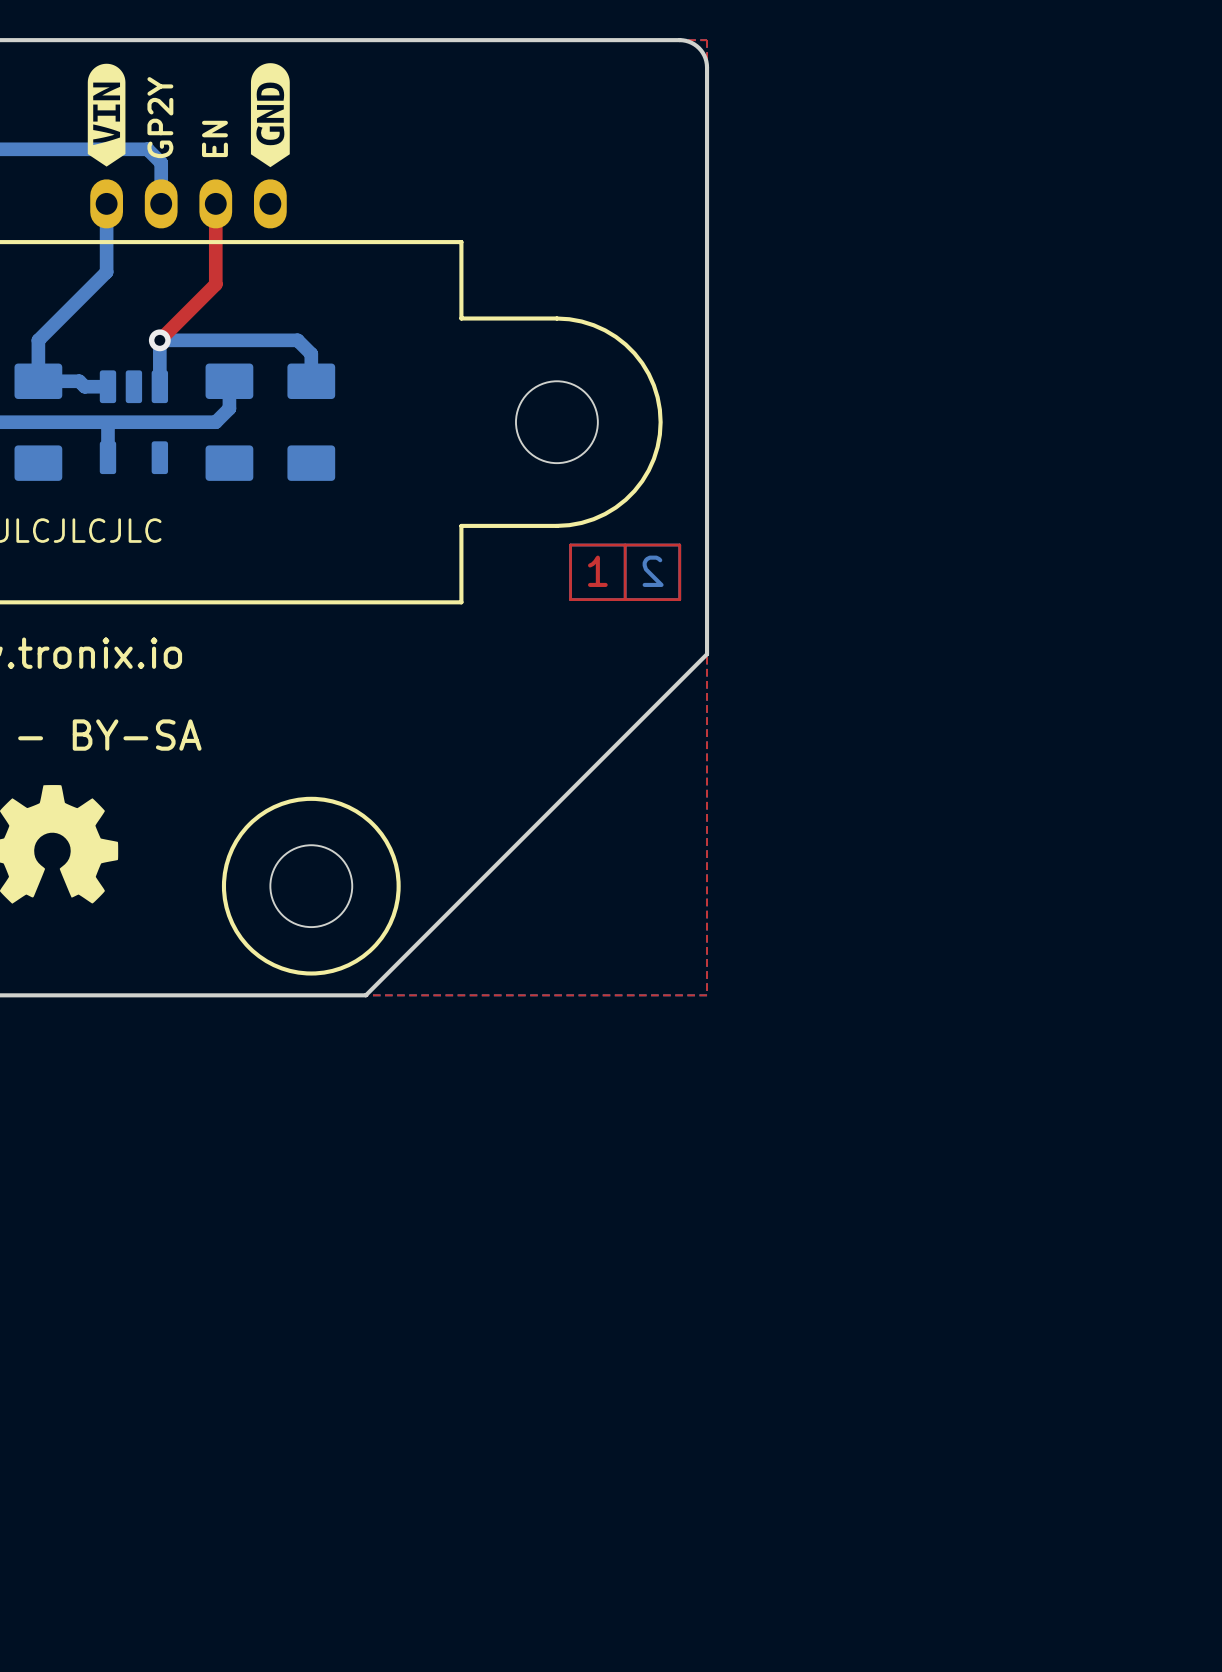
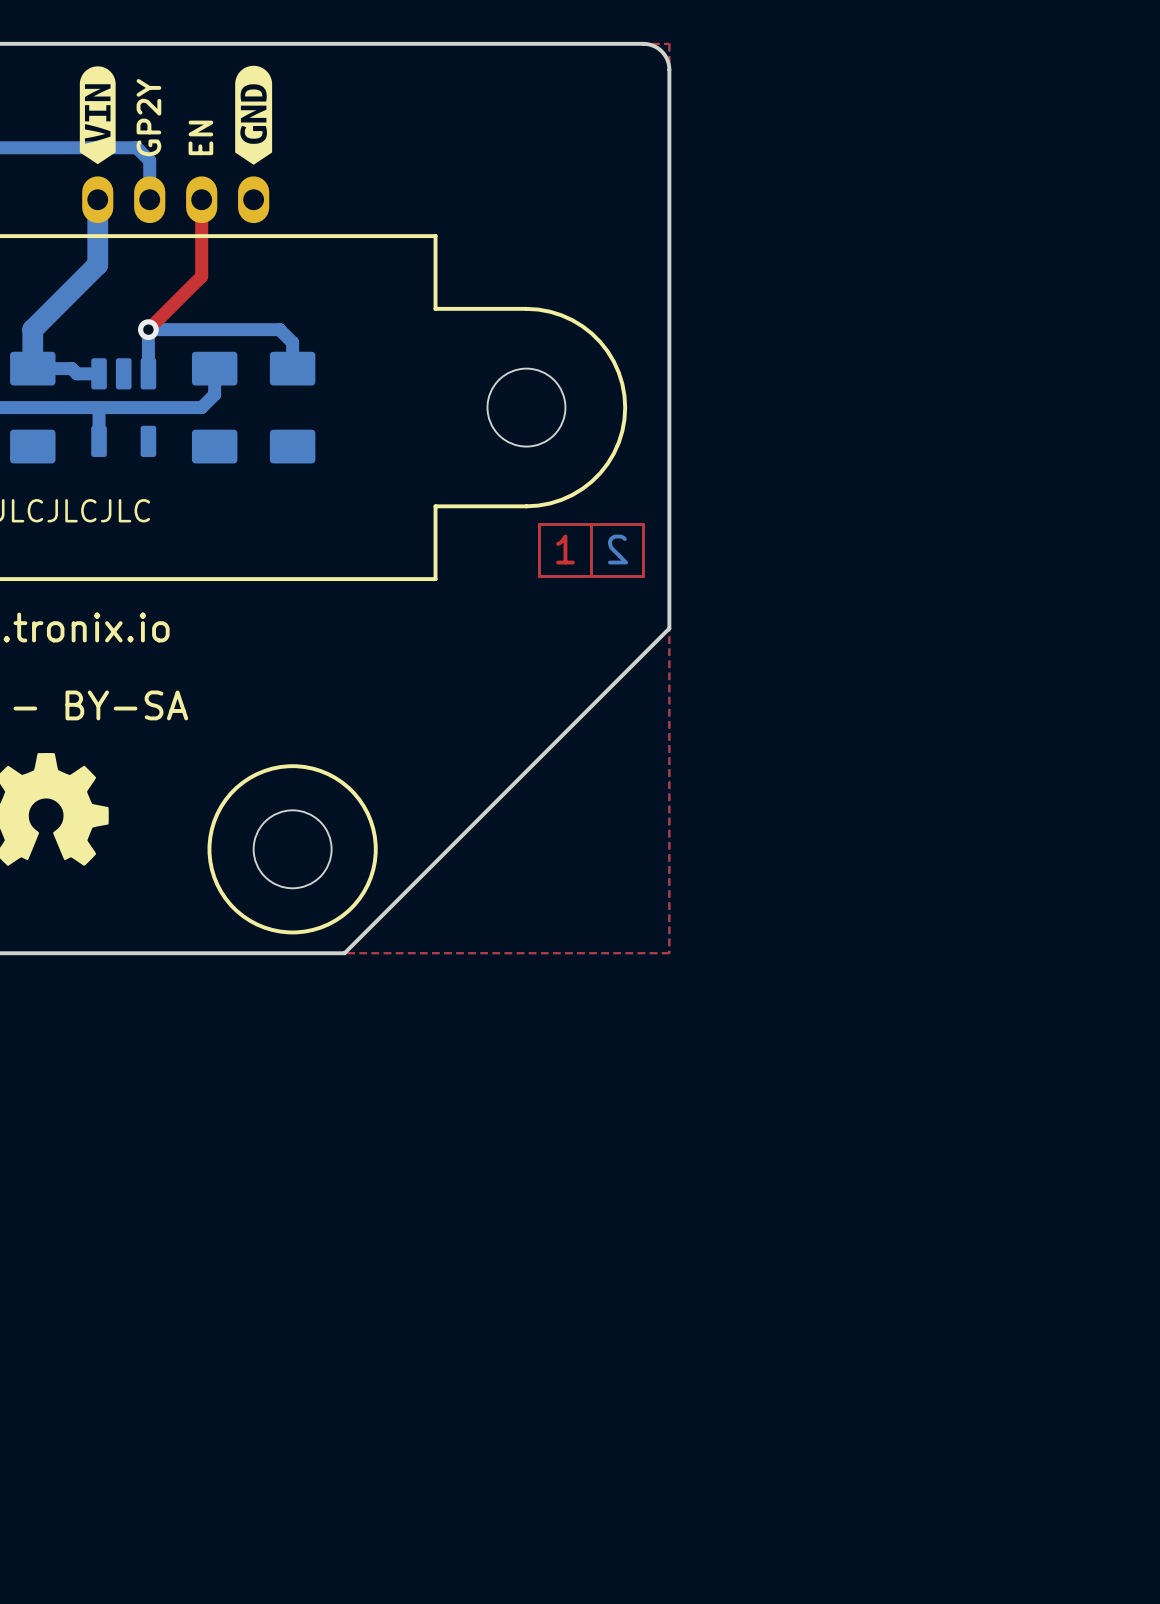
bottom track width: thin (106, 203) (106, 272) (38, 340) (38, 381) -> thick (97, 199) (97, 264) (32, 329) (32, 368)

